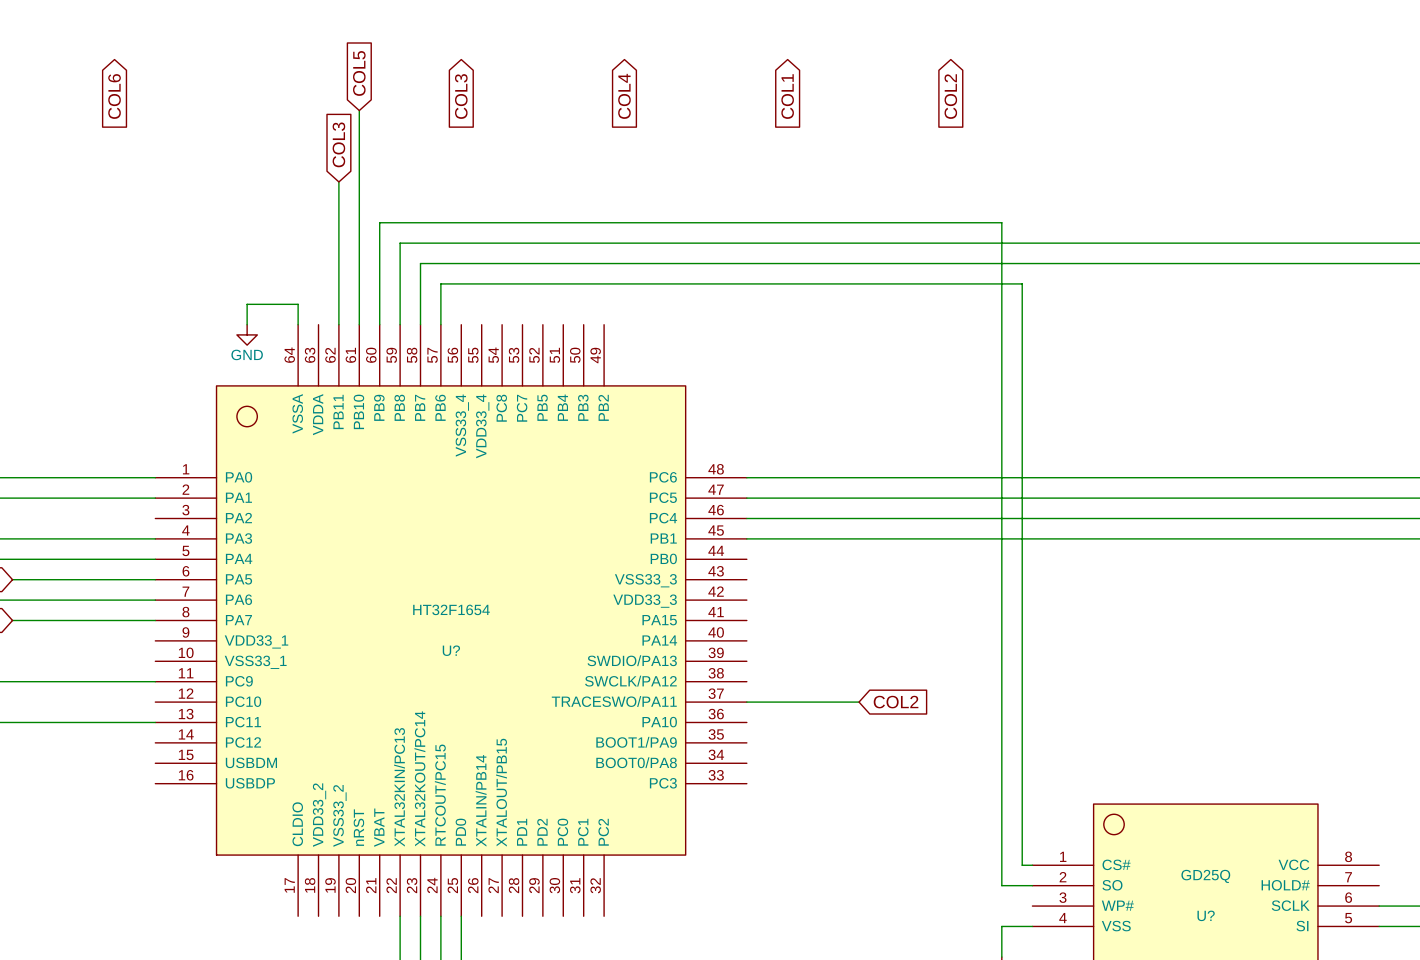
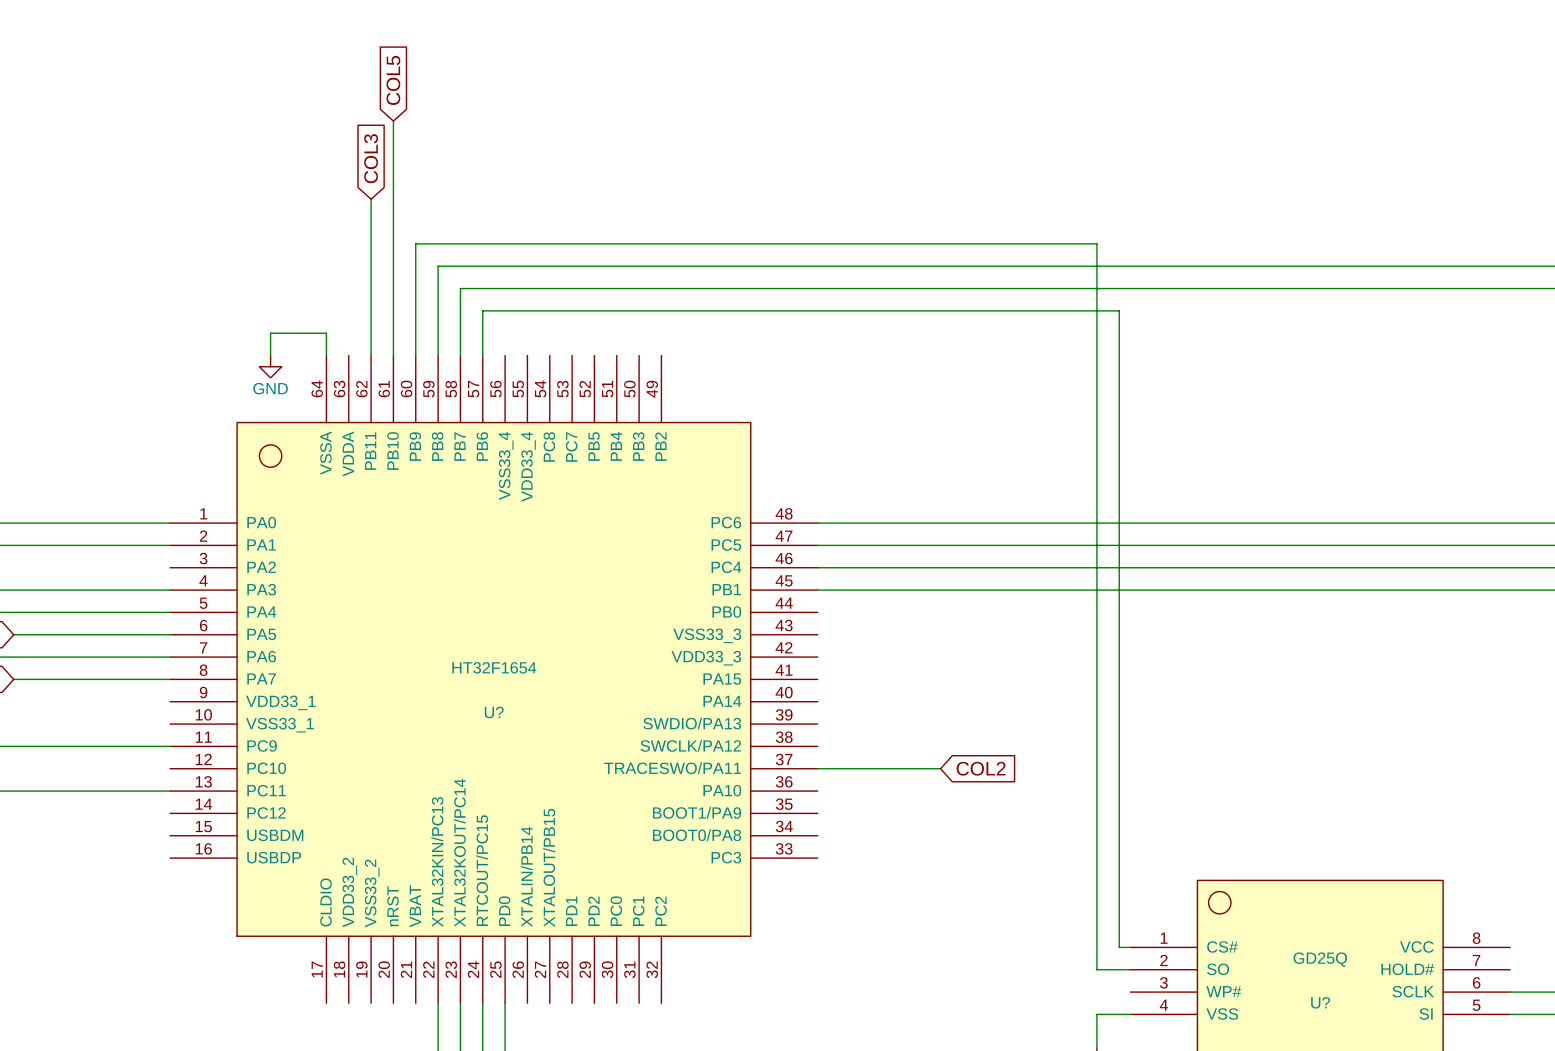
global label: COL6 (114, 96) -> none
global label: COL3 (461, 96) -> none
global label: COL4 (624, 96) -> none
global label: COL1 (787, 96) -> none
global label: COL2 (950, 96) -> none

